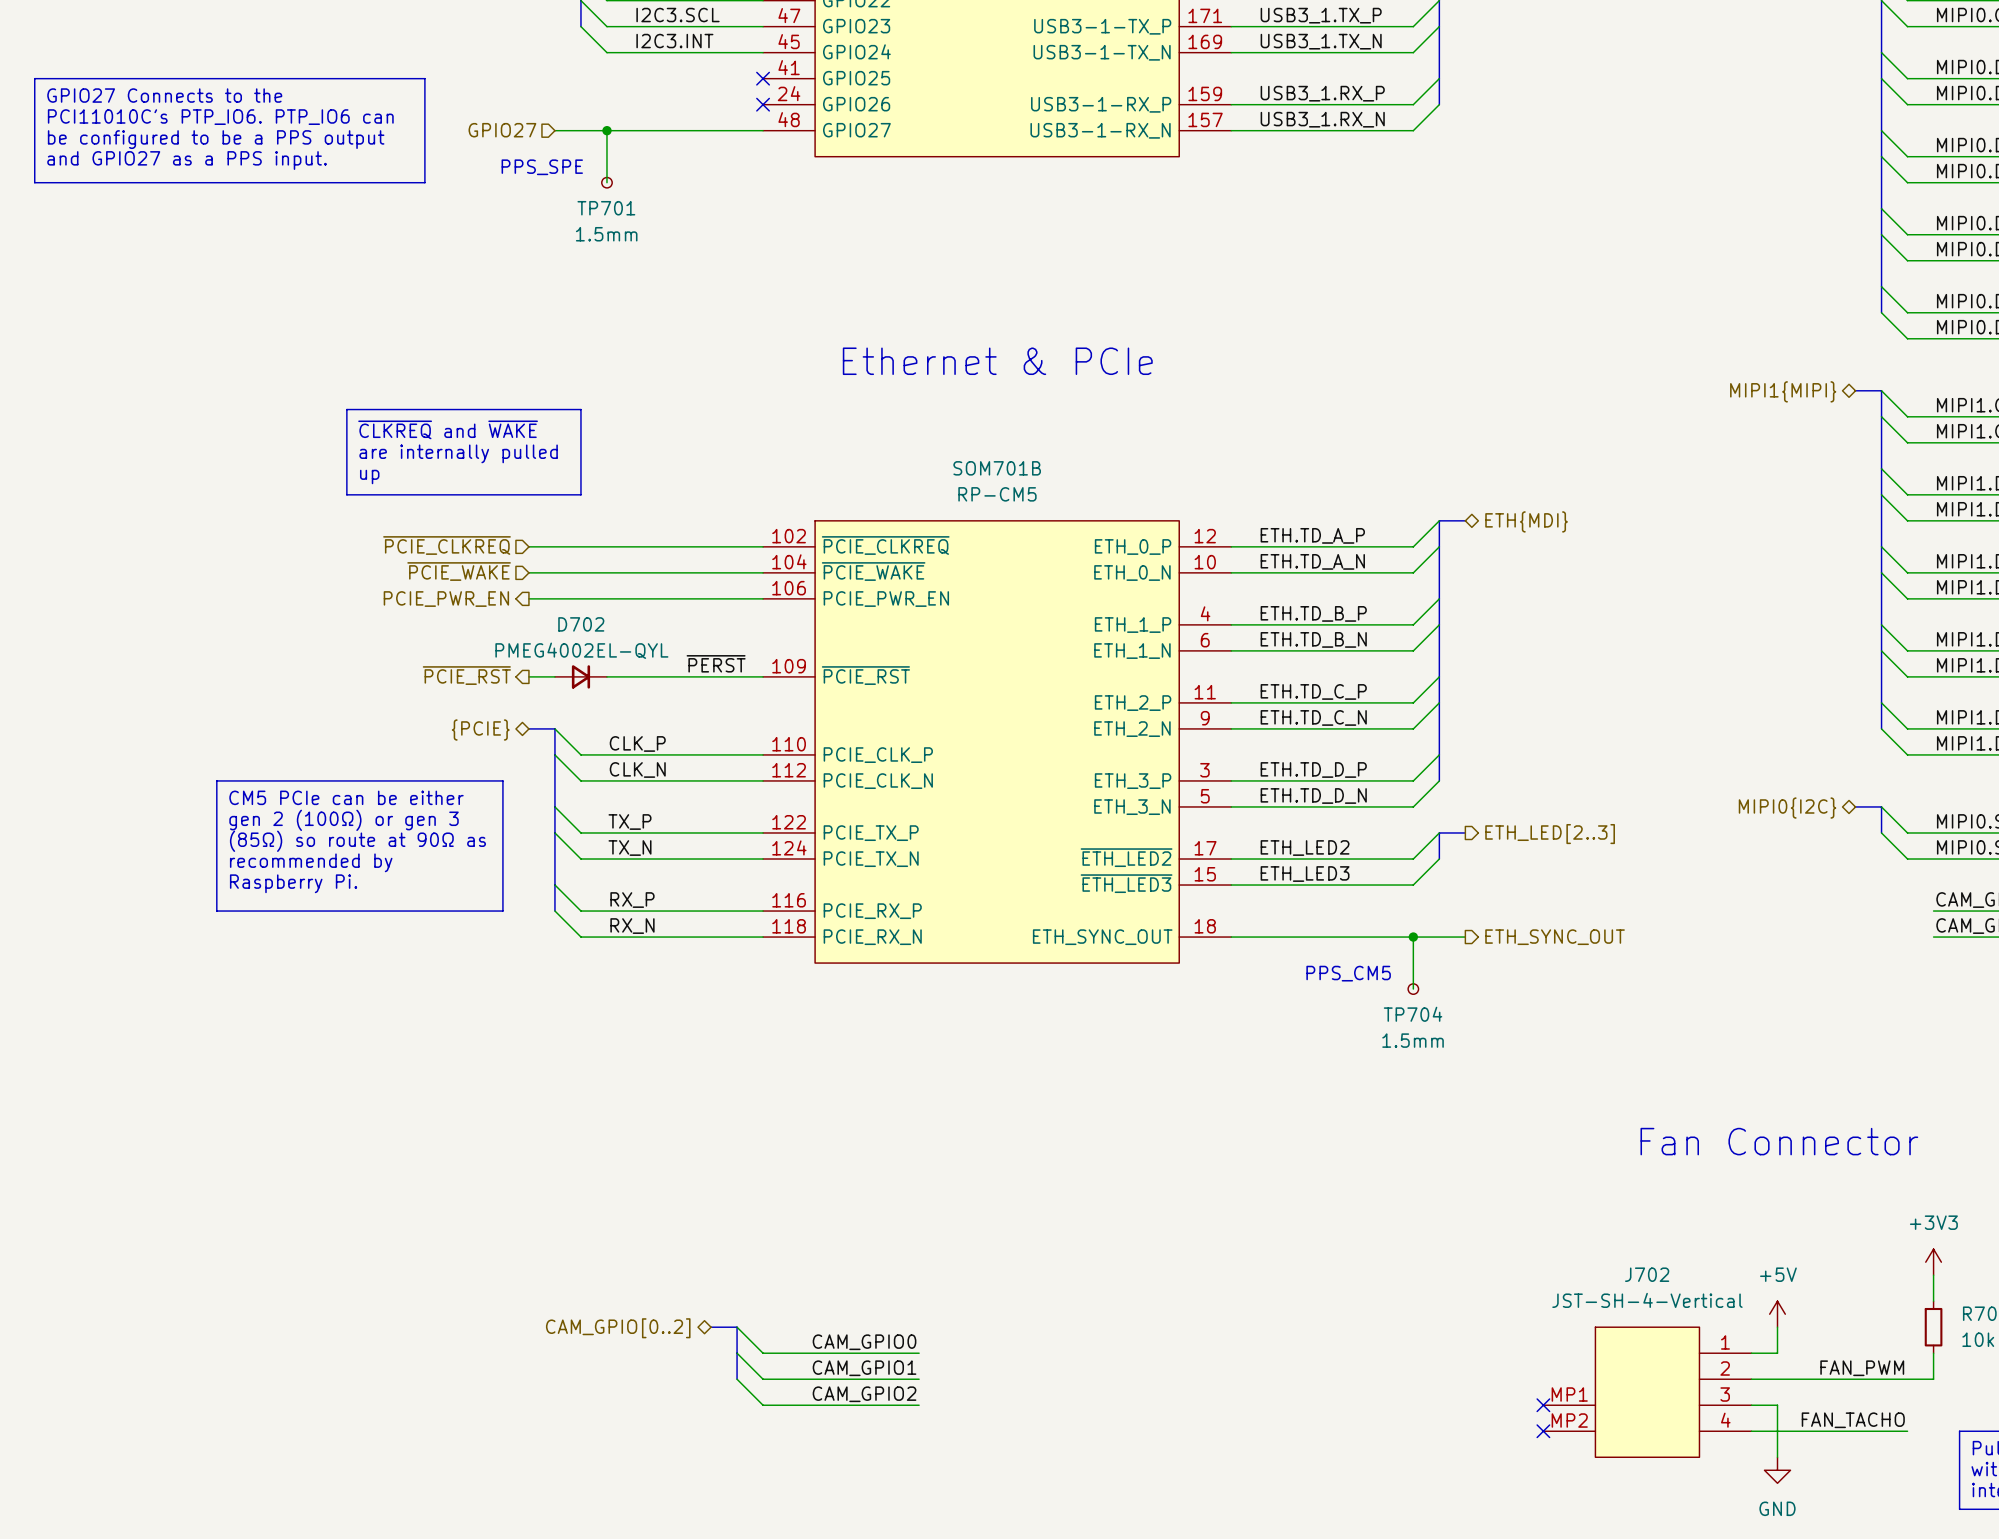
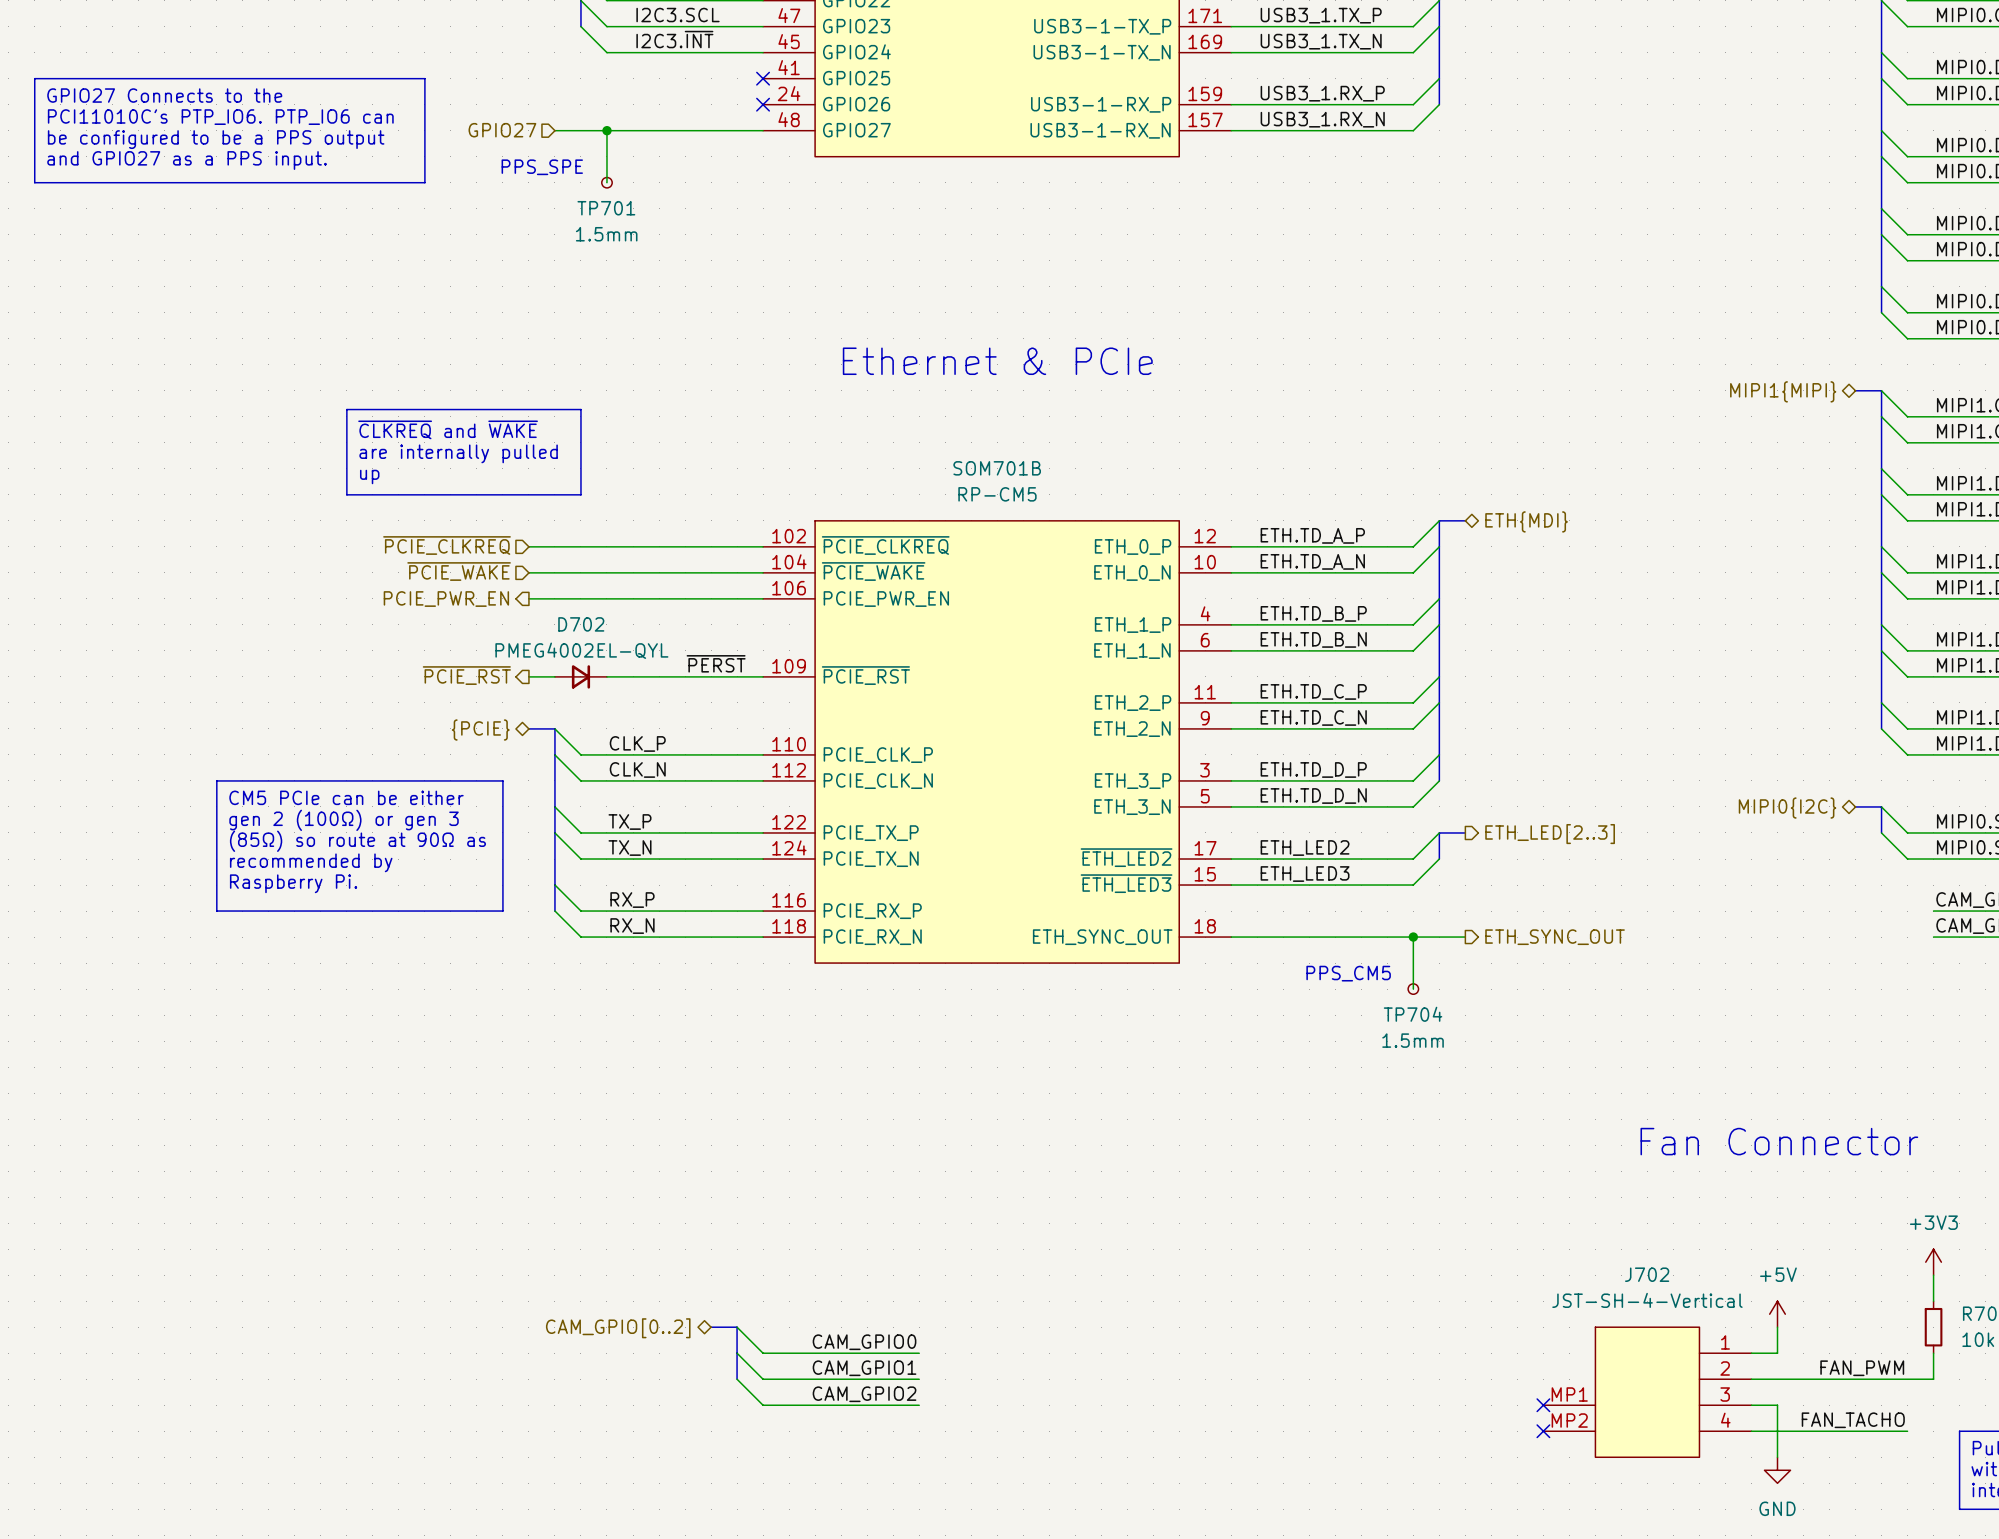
label: I2C3.INT (674, 41) -> I2C3.~{INT} (674, 39)

